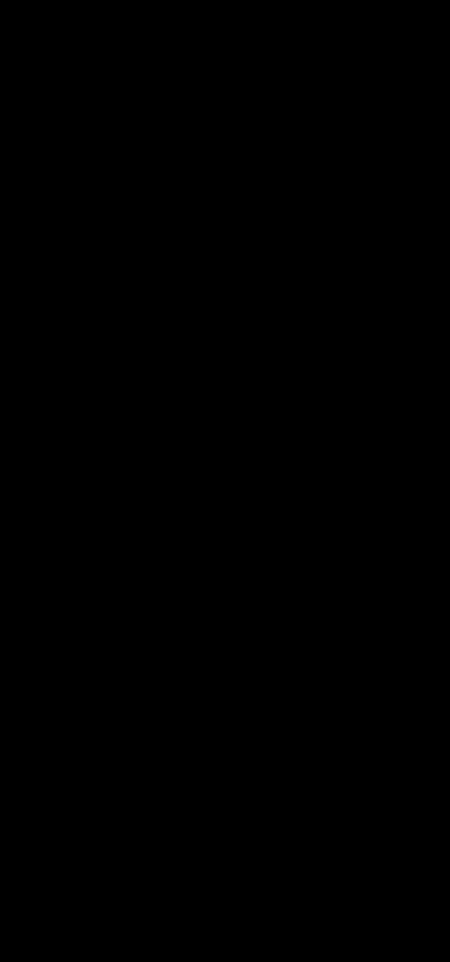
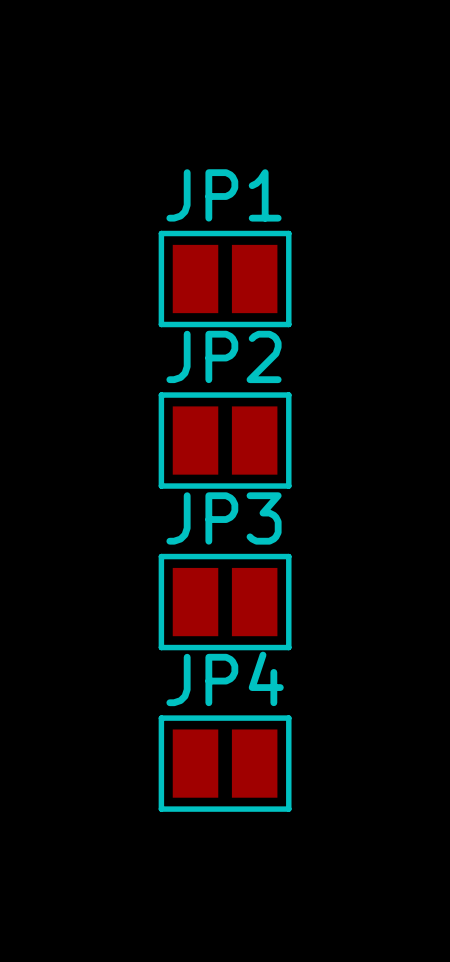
JP1: none -> (225, 279)
JP2: none -> (225, 440)
JP3: none -> (225, 602)
JP4: none -> (225, 763)

